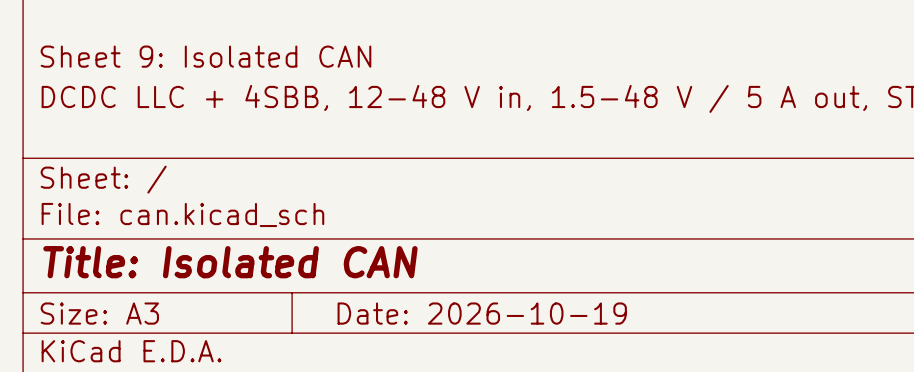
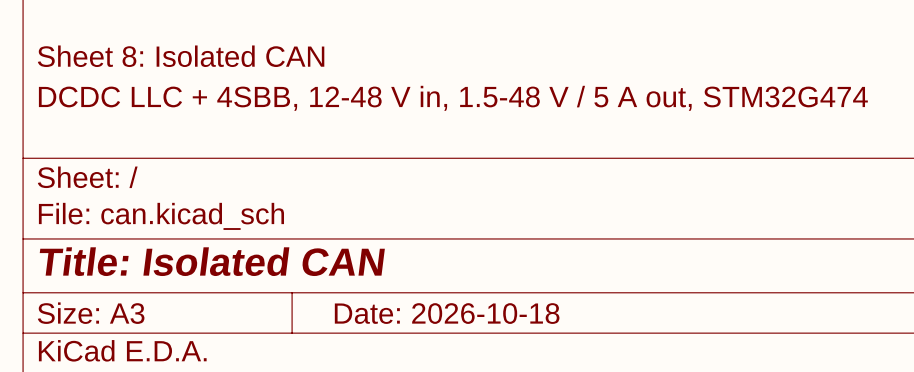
title block: Sheet 9: Isolated CAN (205, 56) -> Sheet 8: Isolated CAN (181, 56)
title block: Date: 2026-10-19 (482, 313) -> Date: 2026-10-18 (447, 313)

